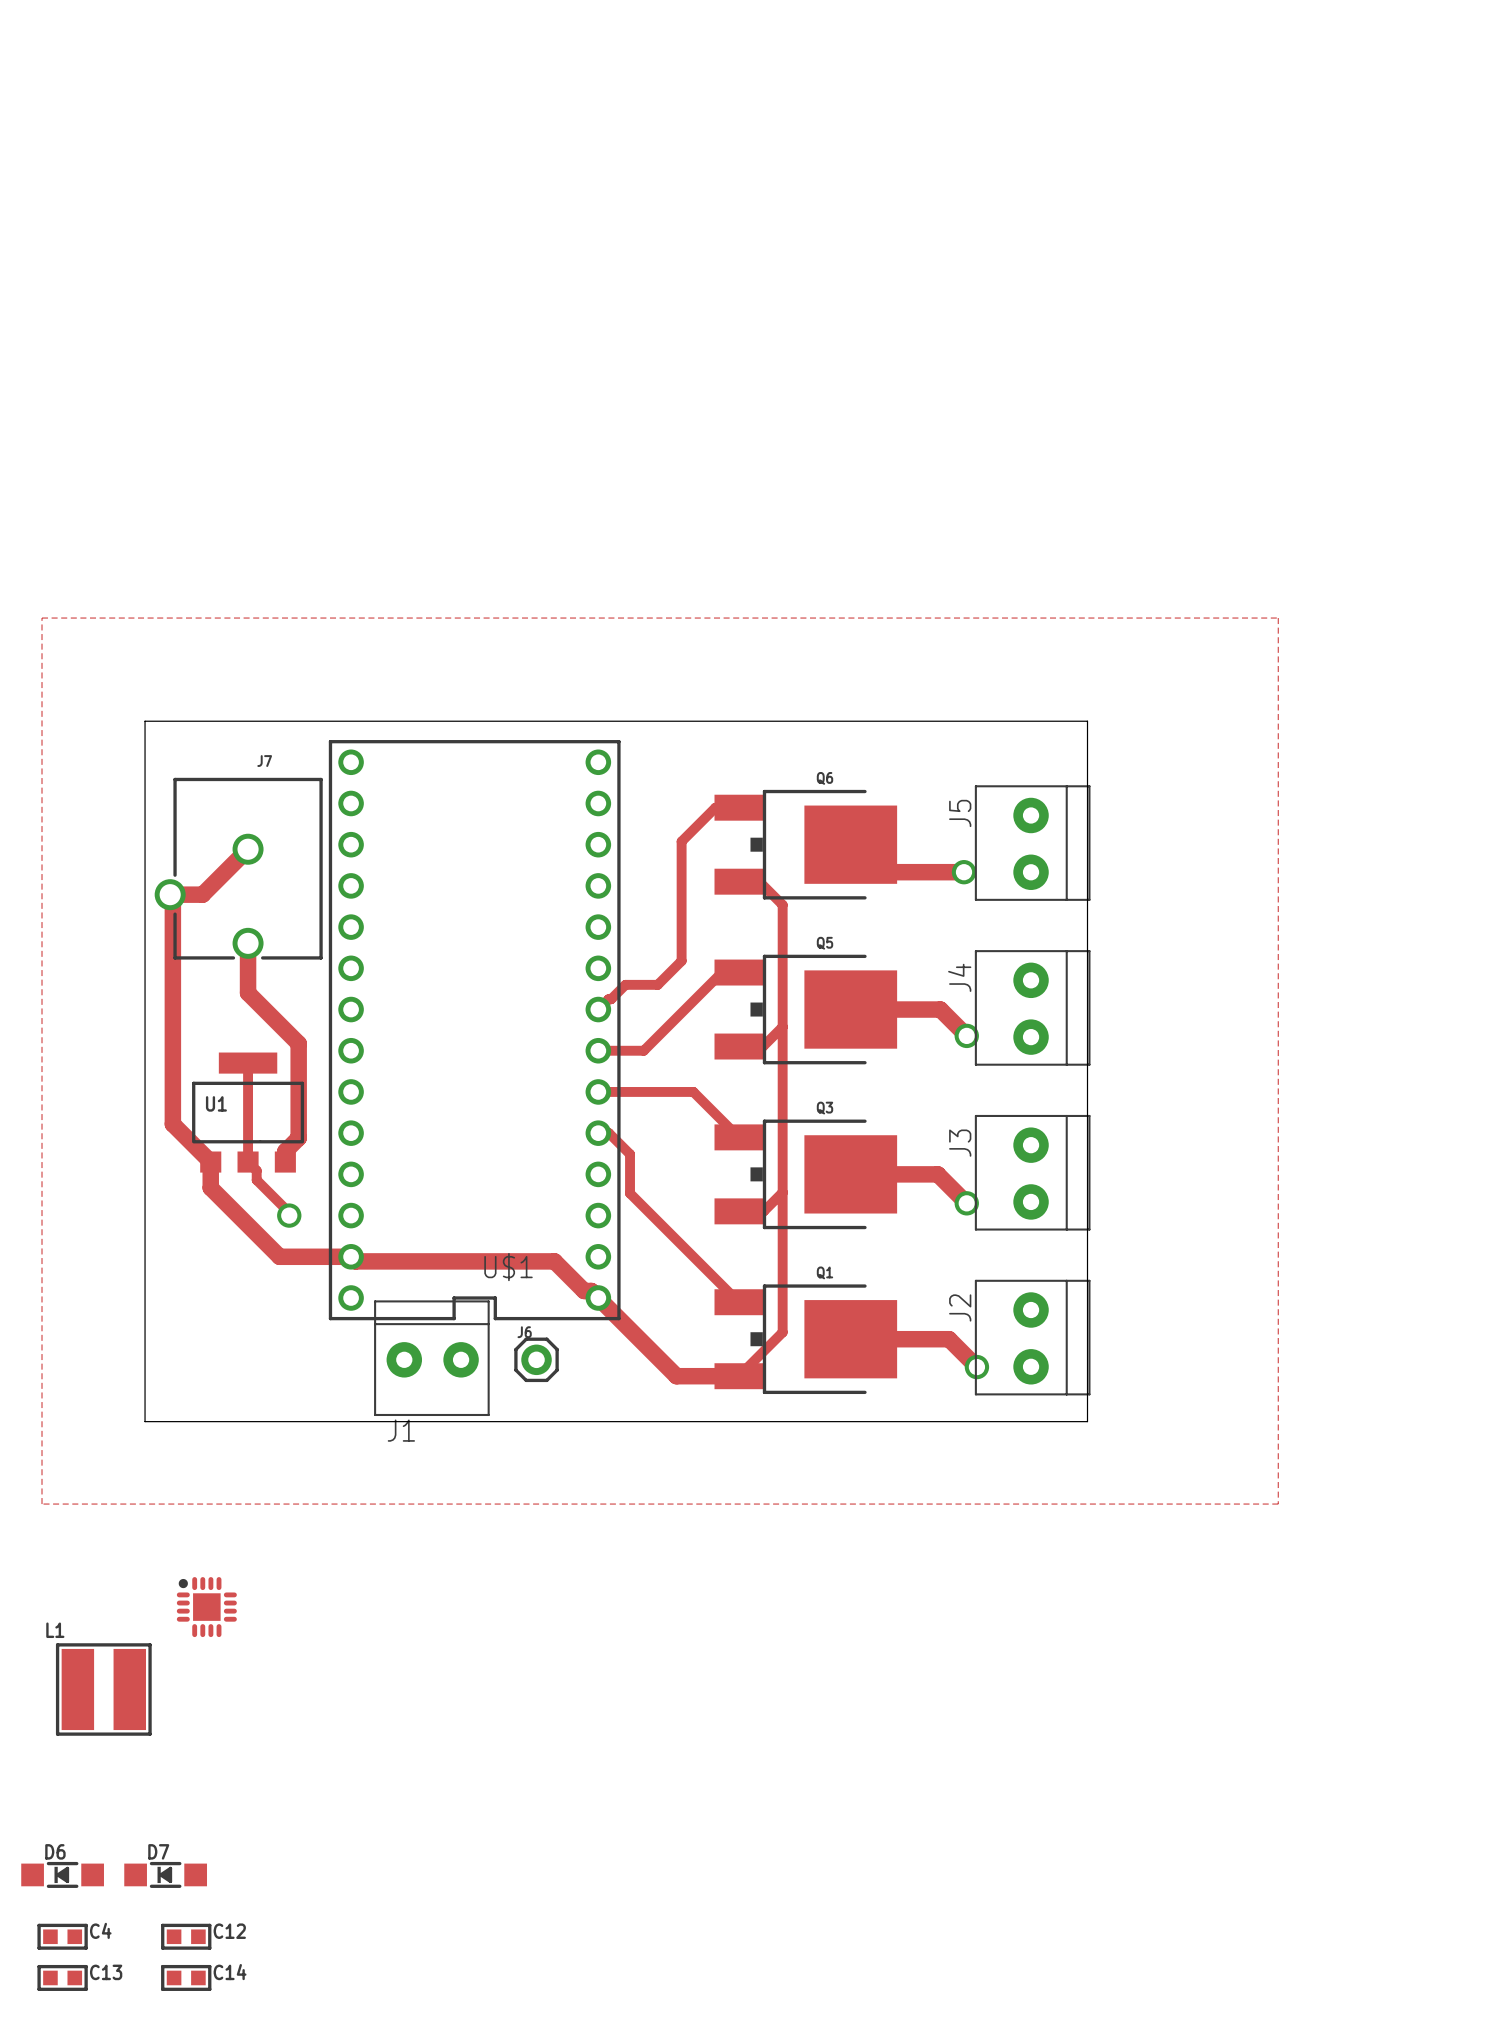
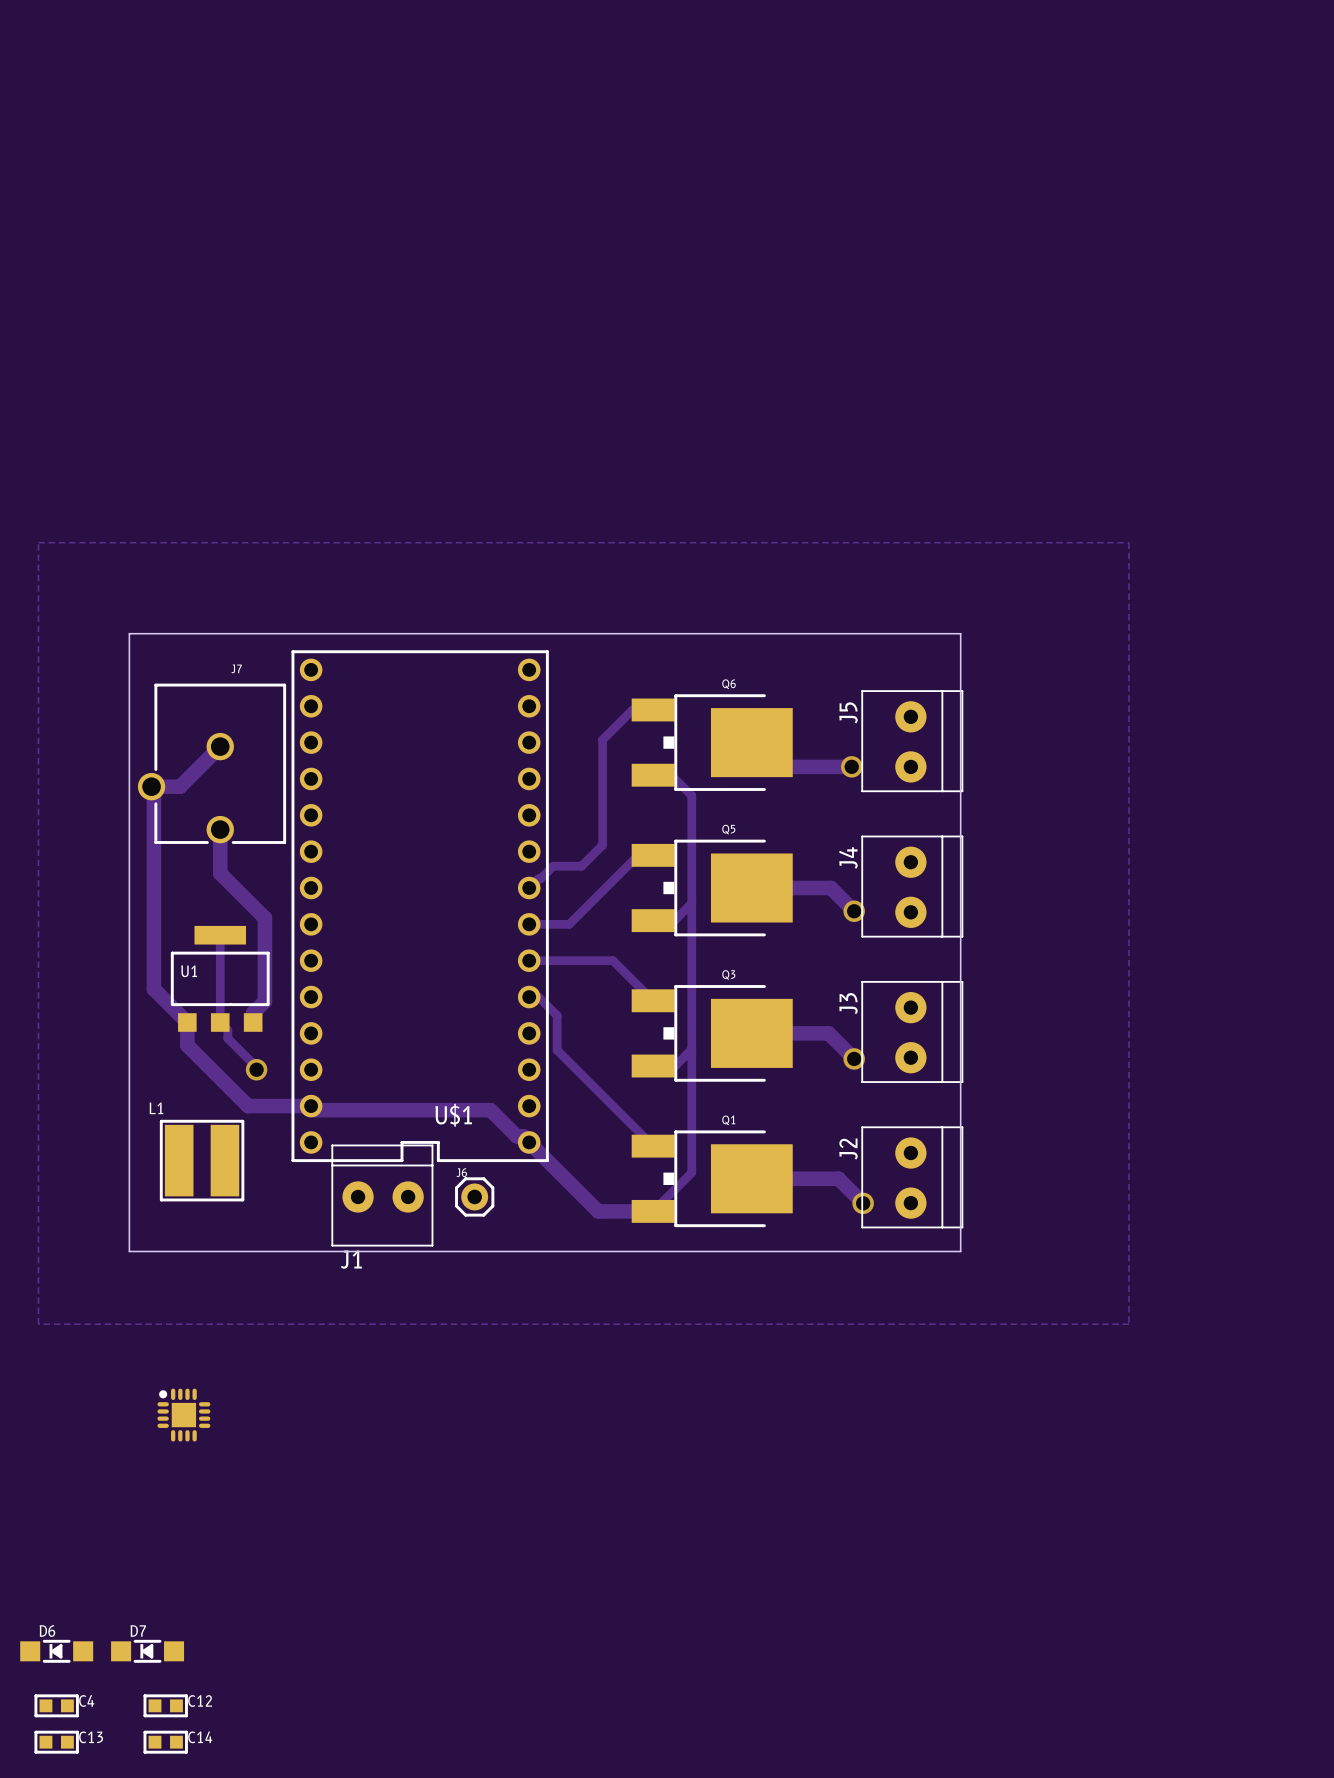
L1 position: (103, 1689) -> (202, 1160)

